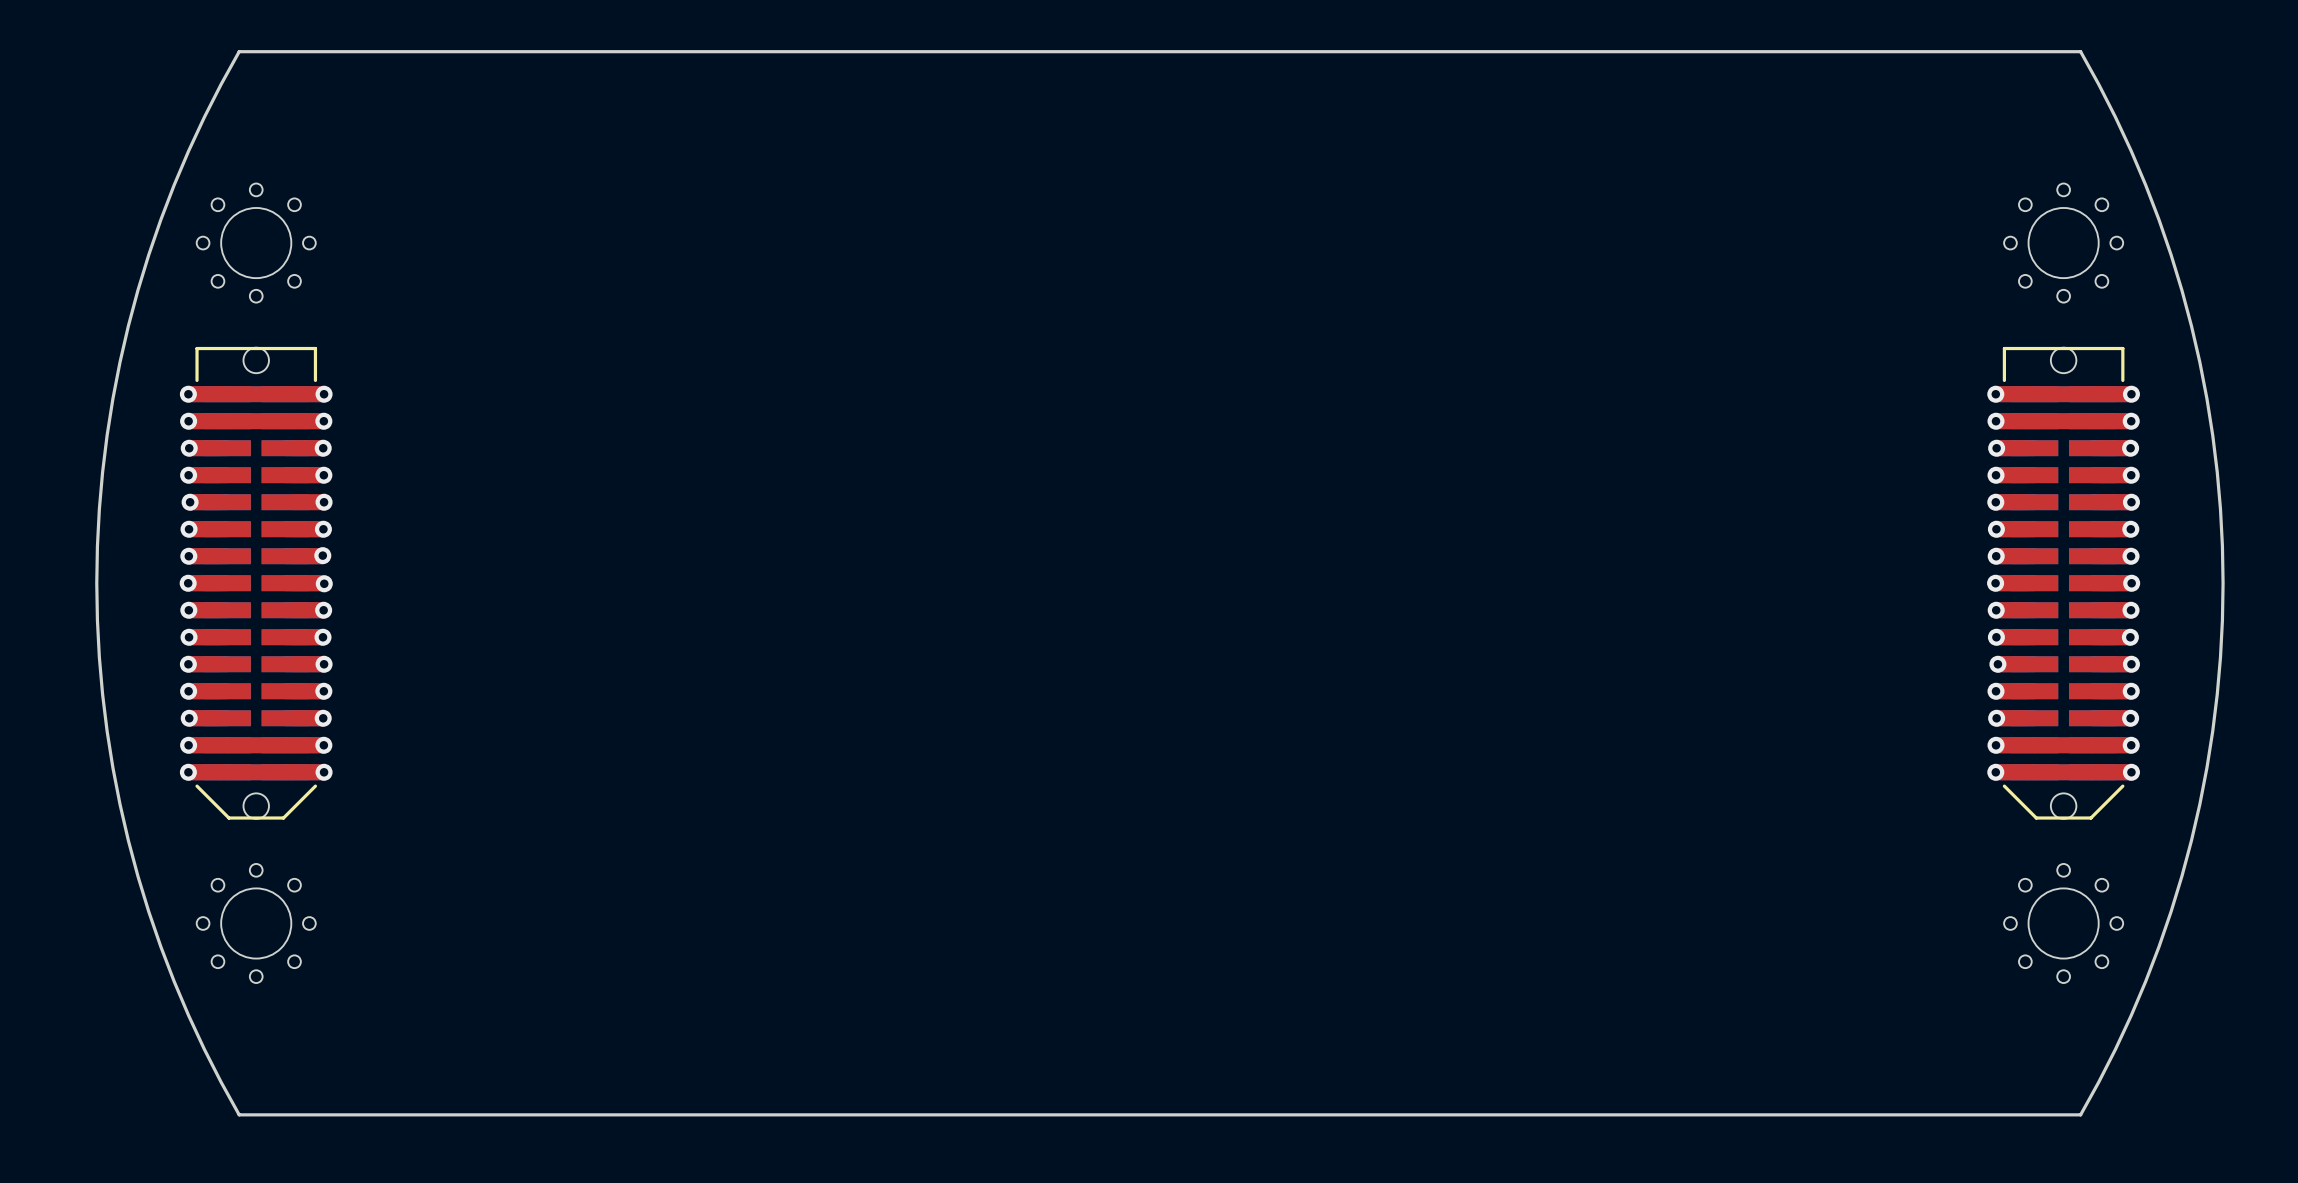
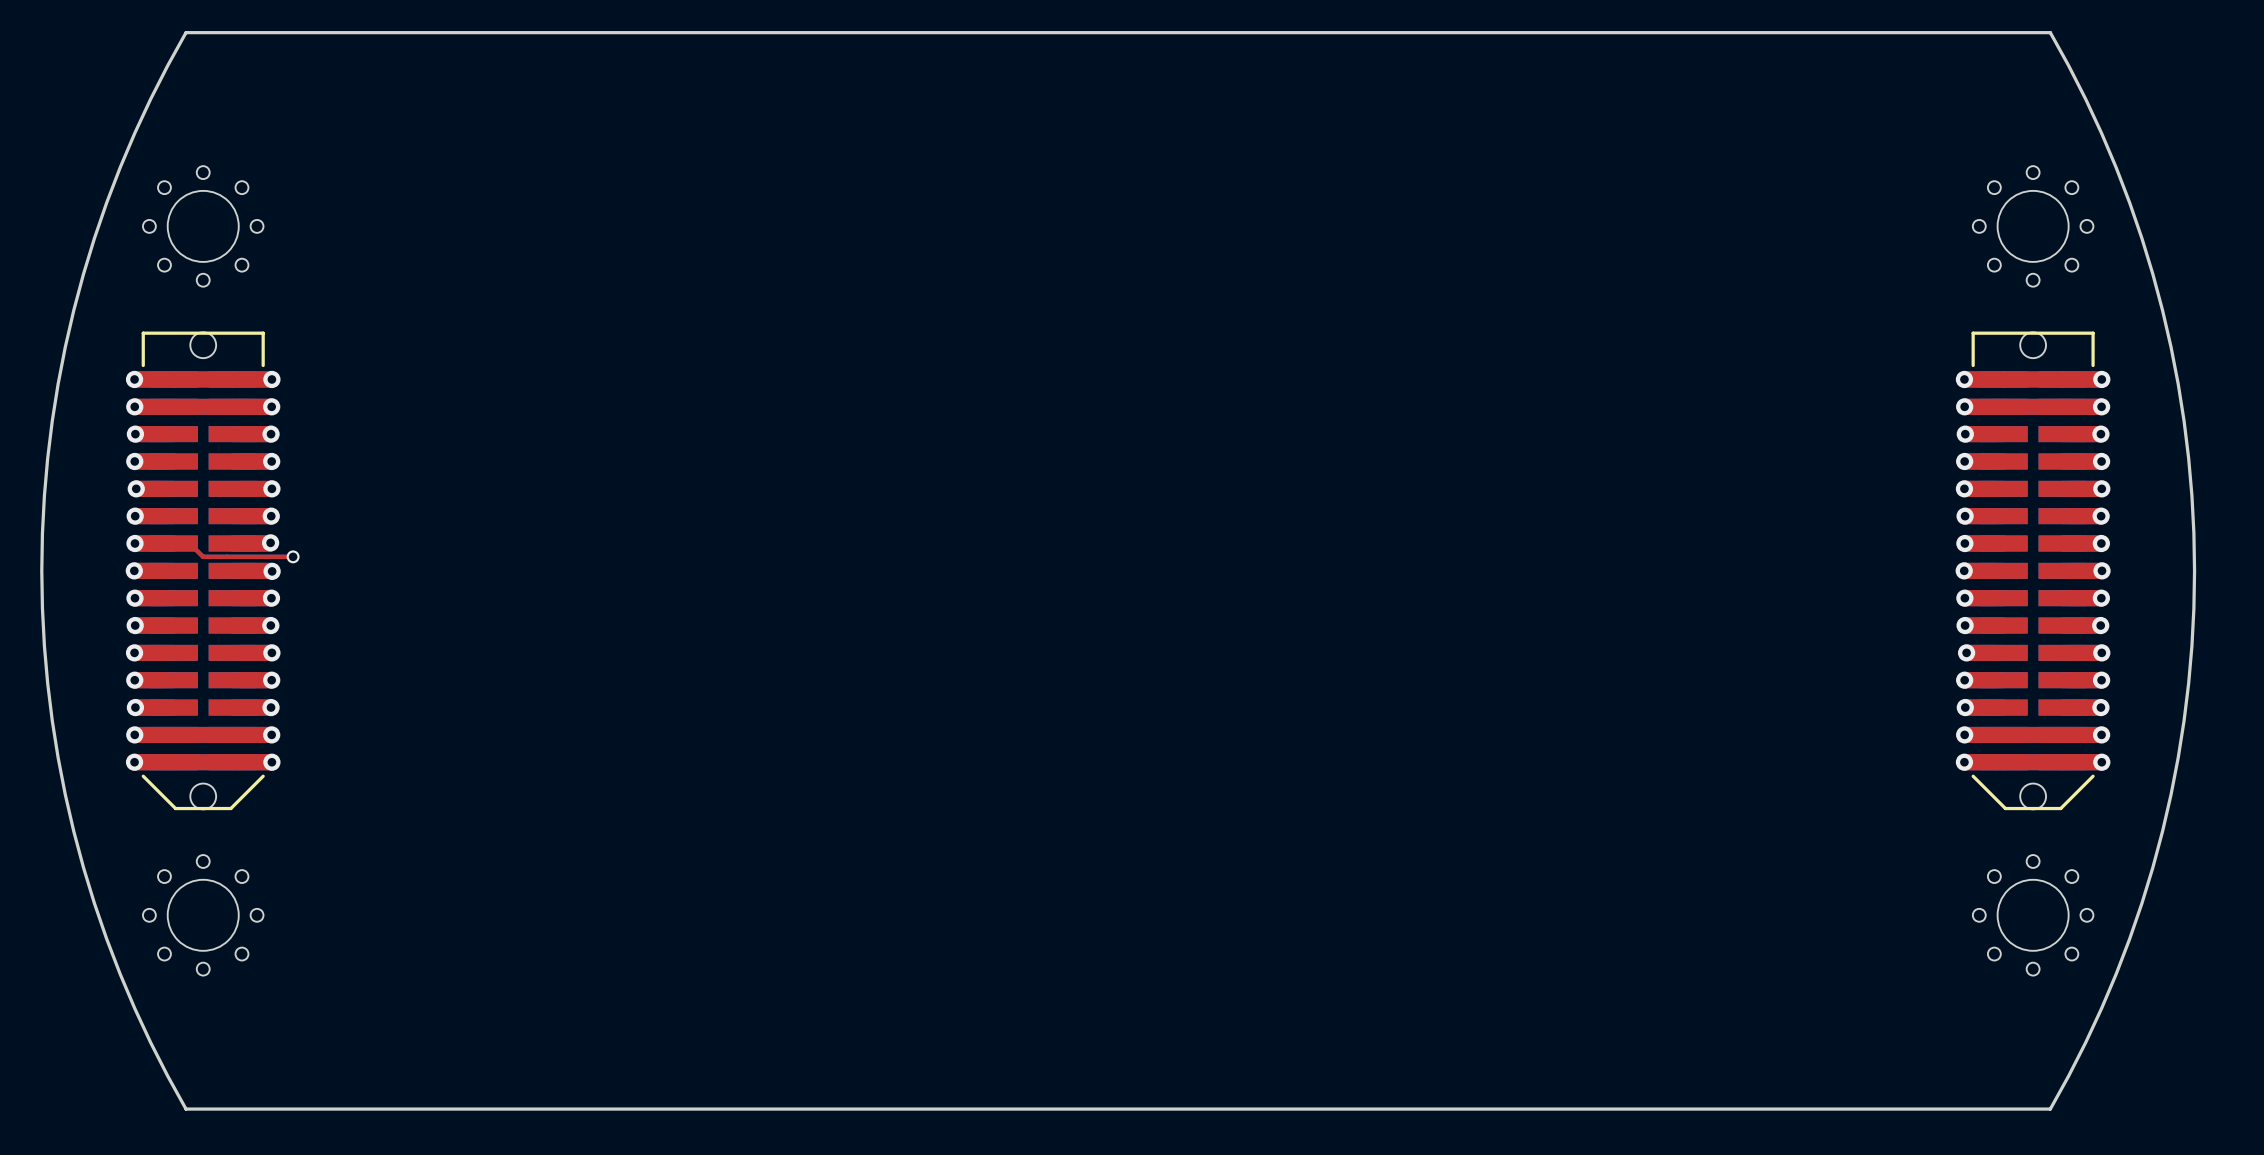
top track: none -> (189, 543) (203, 556) (293, 556)
via: none -> (293, 556)

